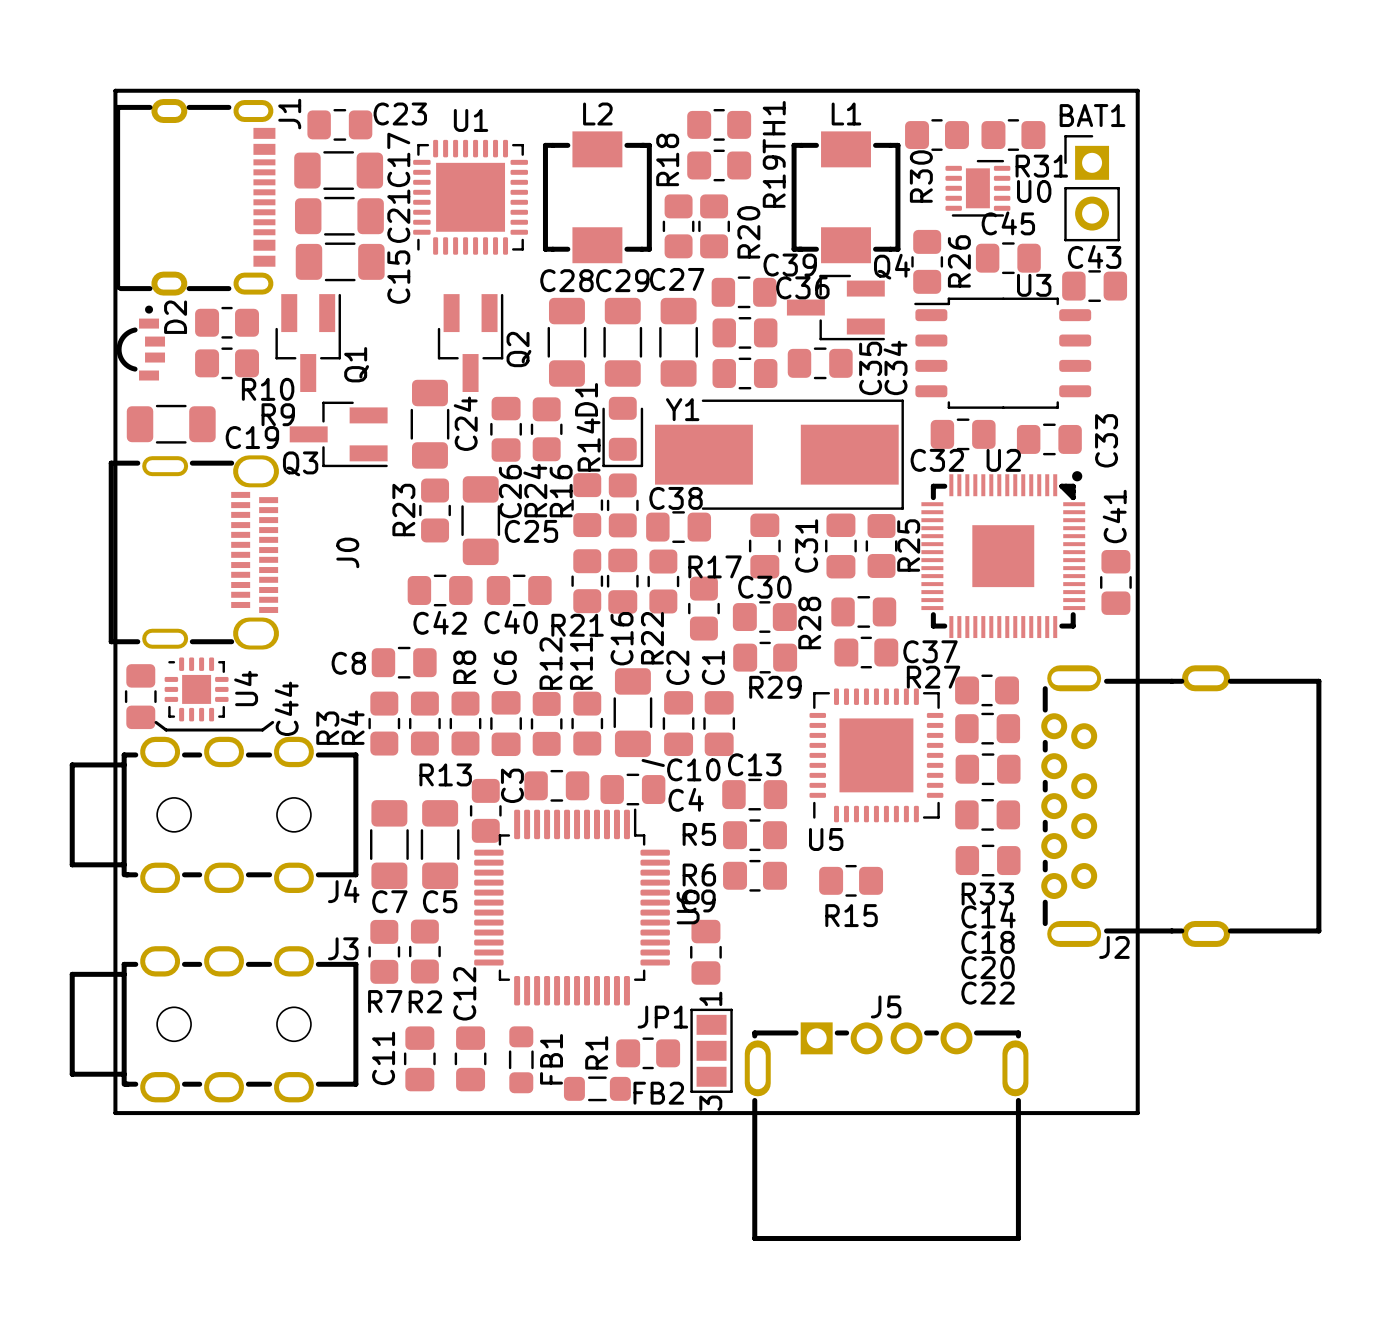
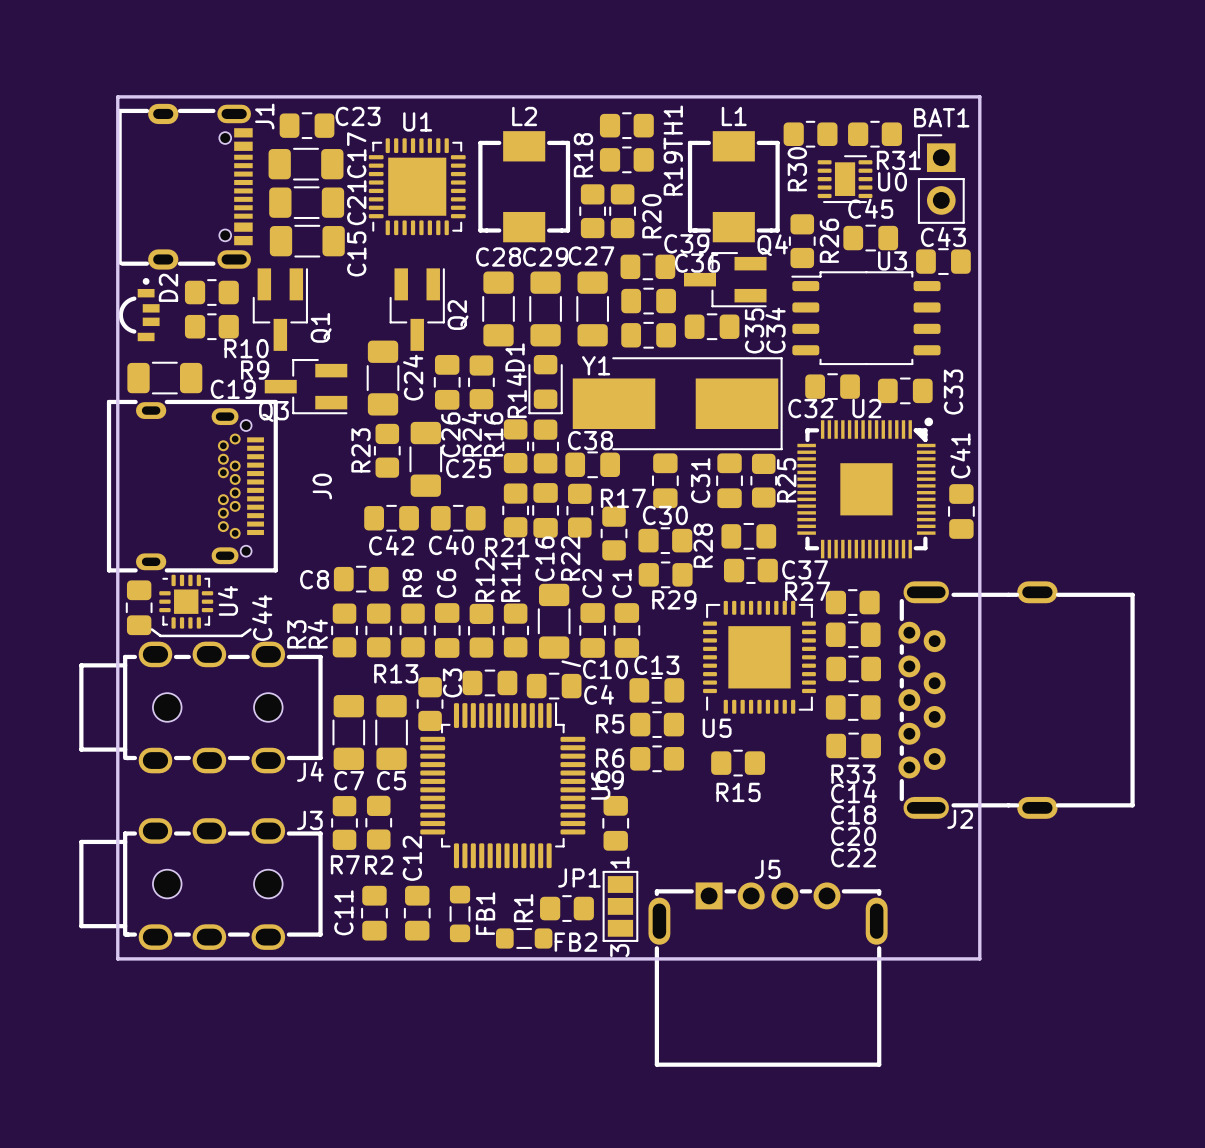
J1 footprint: [115, 99, 276, 296] -> [117, 103, 253, 270]
J0 footprint: [108, 455, 280, 650] -> [106, 399, 278, 573]

